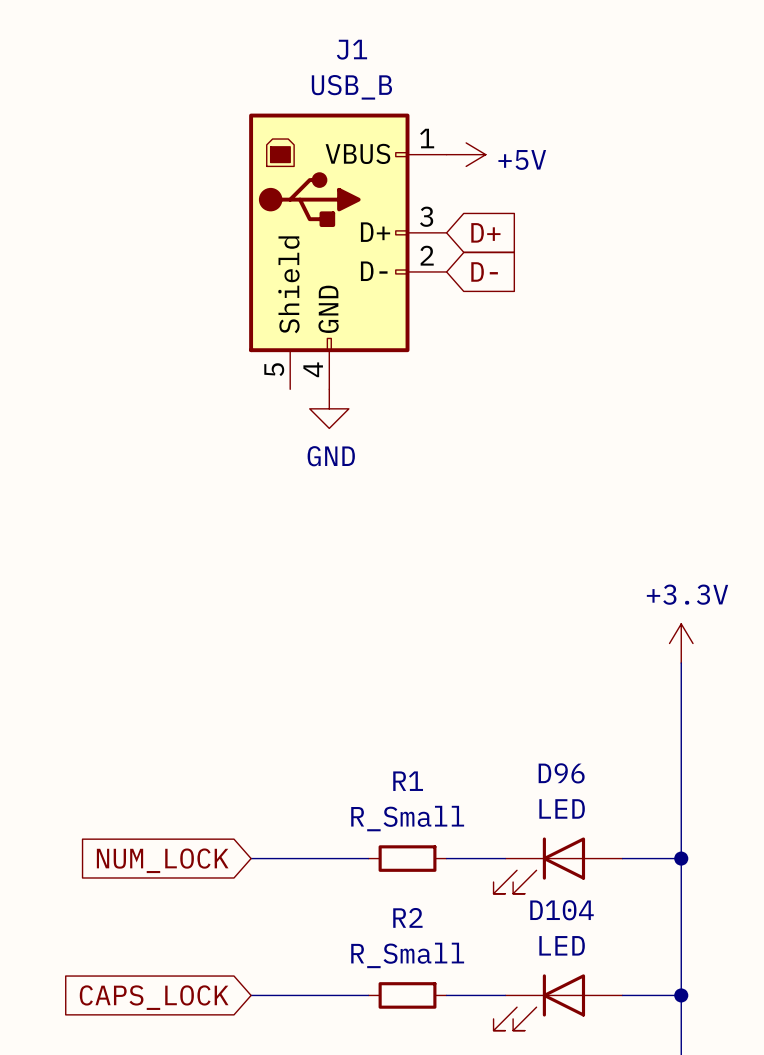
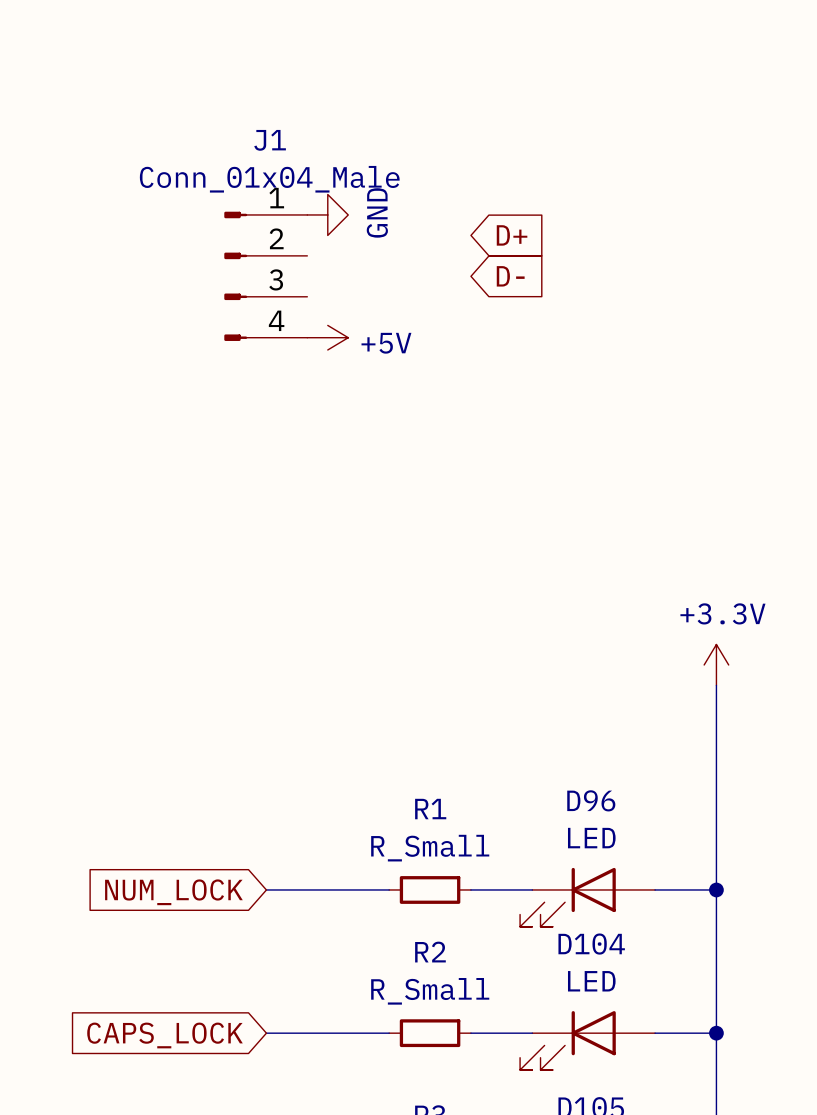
J1 name position: J1 (351, 49) -> J1 (270, 140)
J1 value: USB_B (351, 87) -> Conn_01x04_Male (269, 179)
J1 symbol: [249, 113, 447, 390] -> [224, 211, 308, 341]
power symbol position: +5V (466, 154) -> +5V (327, 337)
power symbol rotation: 0° (329, 408) -> 90° counterclockwise (327, 214)
power symbol position: GND (329, 408) -> GND (327, 214)

